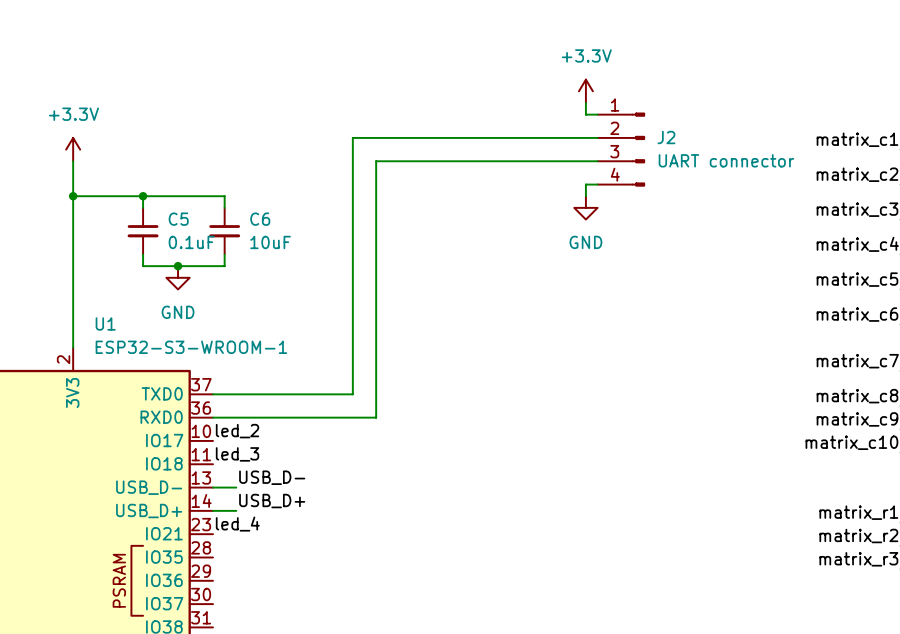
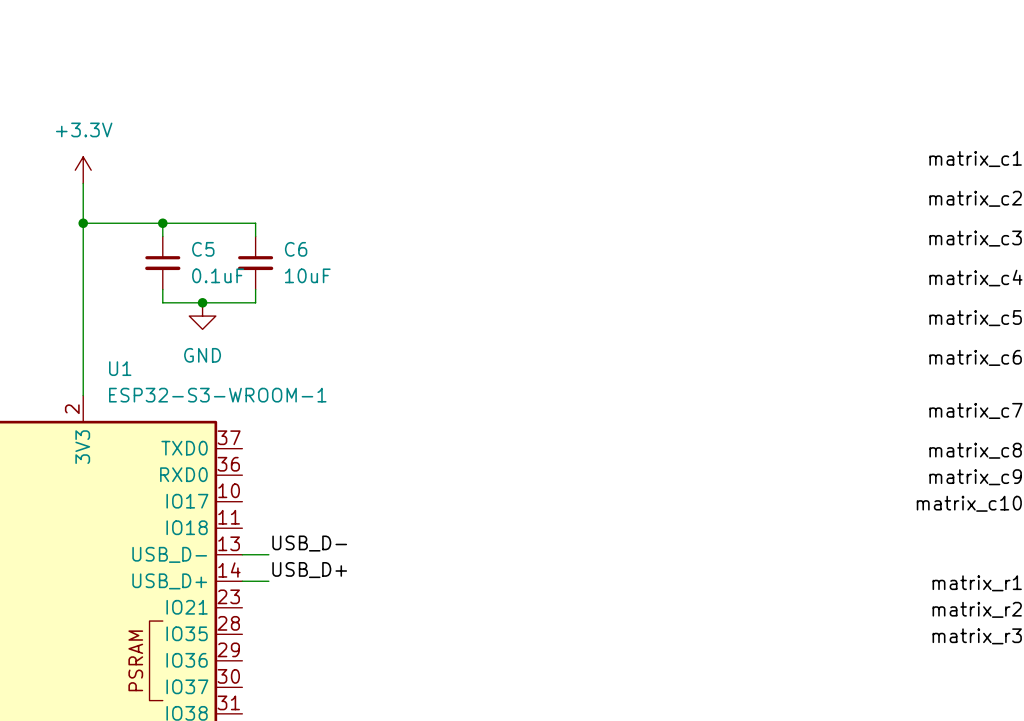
power symbol: +3.3V (585, 91) -> none
wire: (585, 102) (585, 114) (597, 114) -> none
wire: (597, 137) (352, 137) (352, 394) (213, 394) -> none
J2: UART connector (621, 149) -> none
wire: (597, 161) (376, 161) (376, 417) (213, 417) -> none
wire: (597, 184) (585, 184) (585, 196) -> none
power symbol: GND (585, 207) -> none
label: led_2 (237, 431) -> none
label: led_3 (237, 454) -> none
label: led_4 (237, 524) -> none

